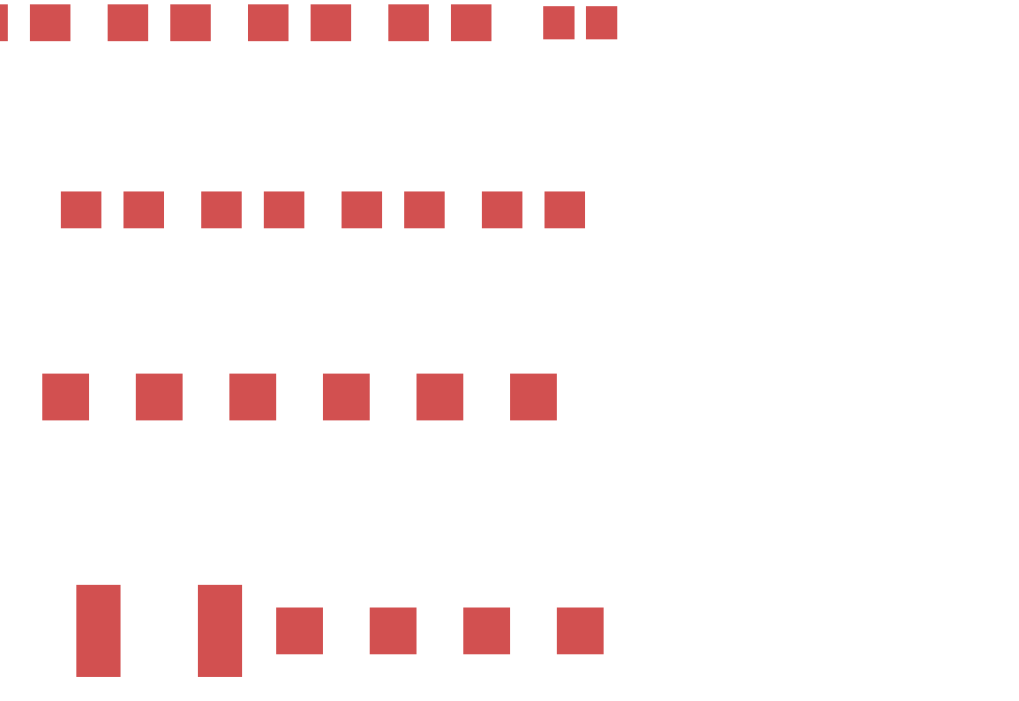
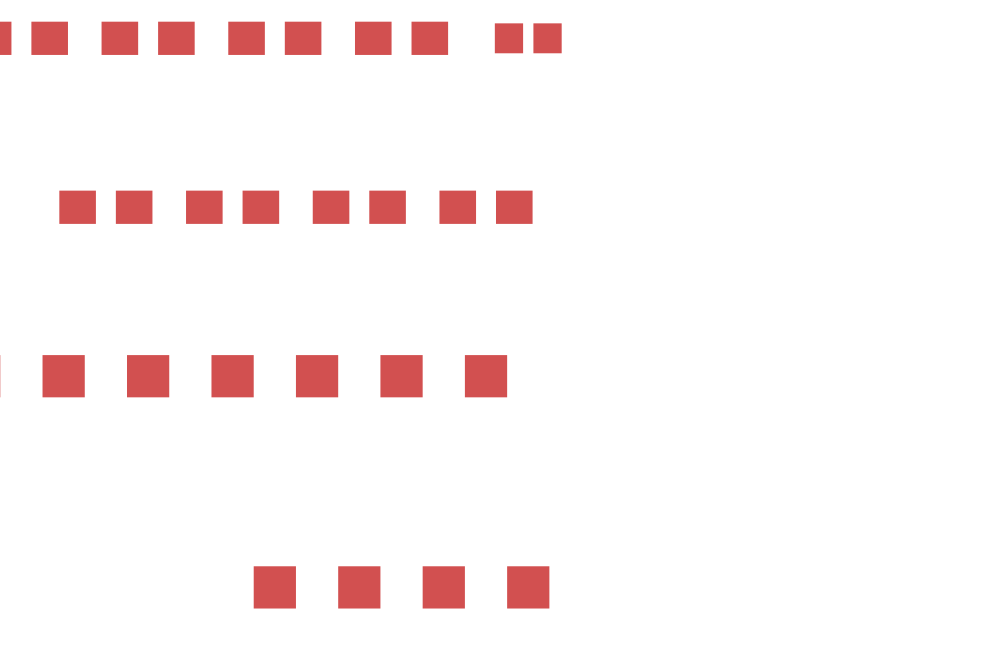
part: (159, 630) -> none

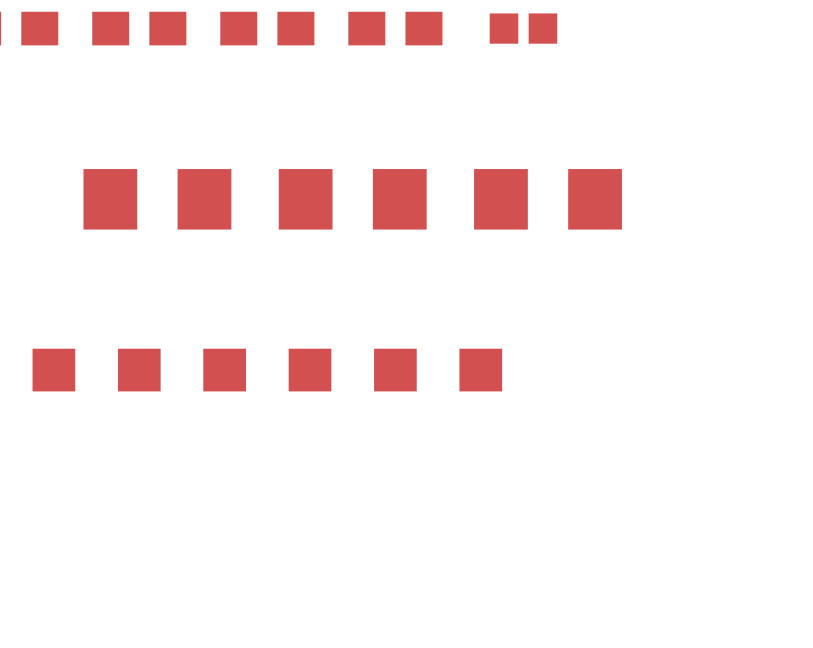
part footprint: [312, 190, 406, 224] -> [278, 169, 427, 230]
part: (105, 207) -> none
part: none -> (157, 199)
part: (232, 207) -> none
part: (486, 207) -> none
part: none -> (548, 199)
part: (317, 587) -> none
part: (486, 587) -> none

